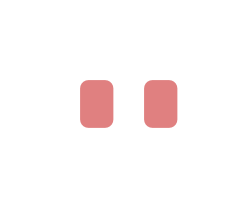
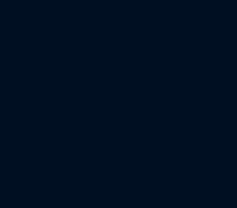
part: (128, 103) -> none

